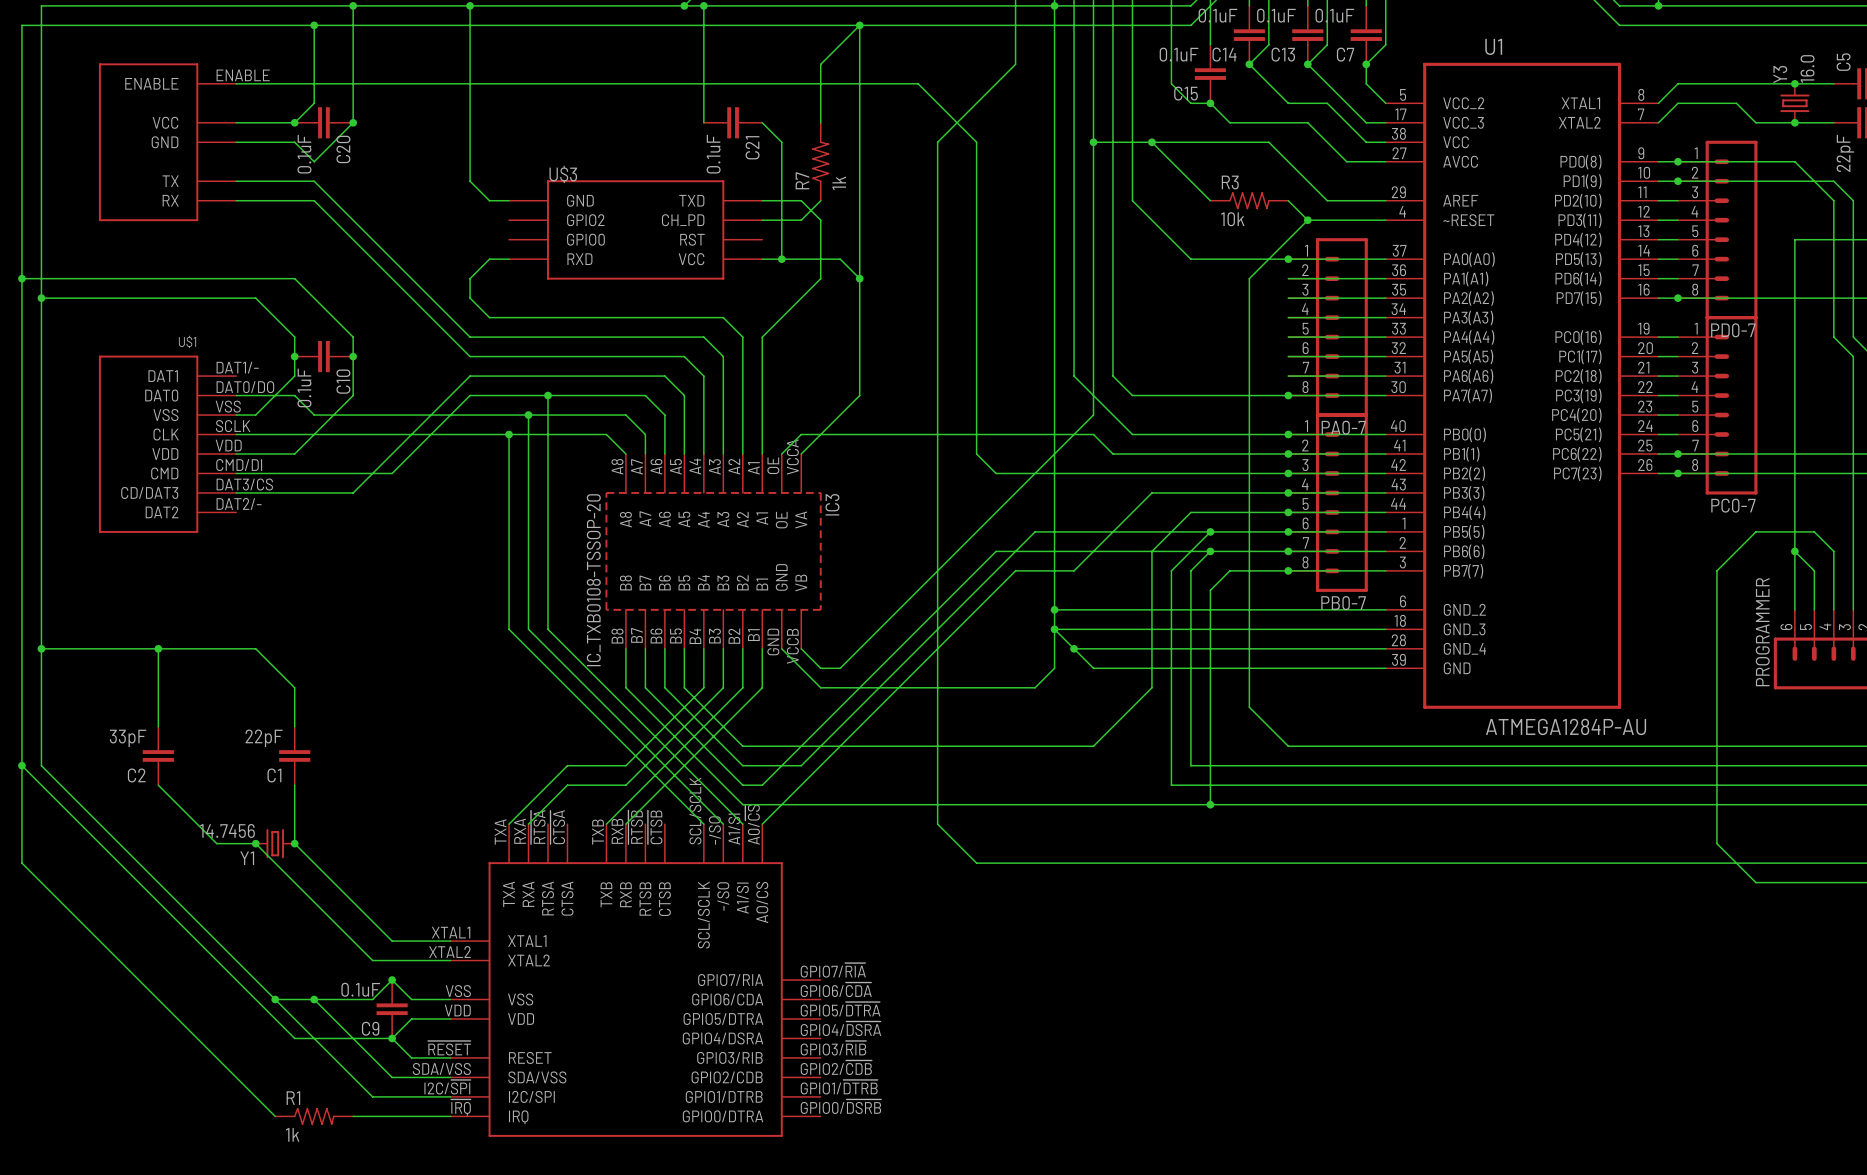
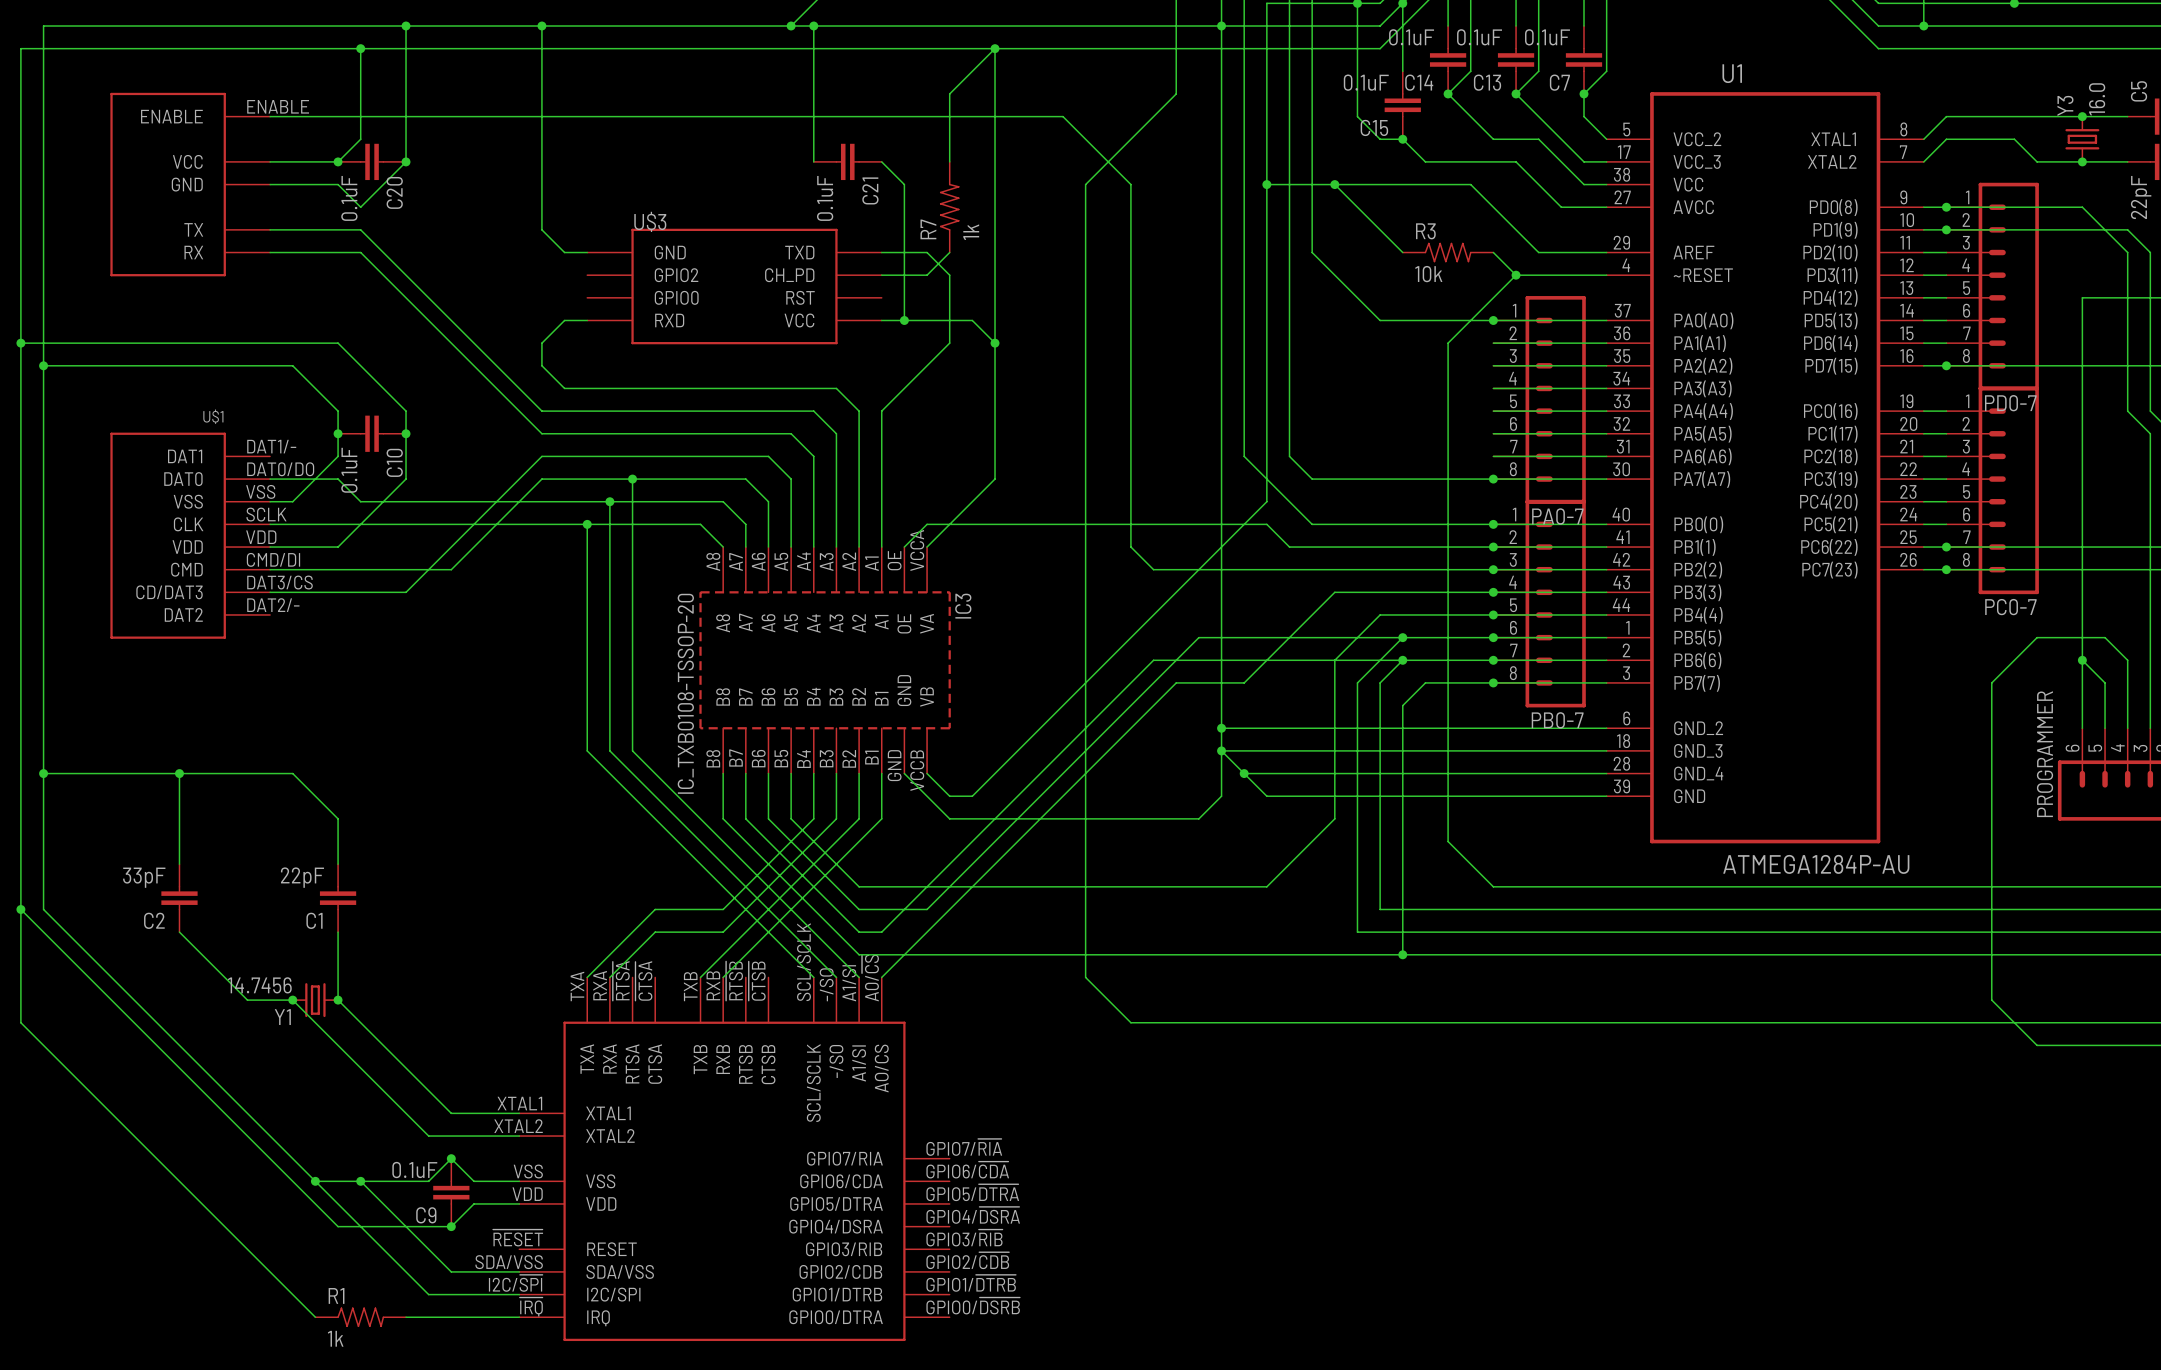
wire: (392, 1038) (411, 1057) (450, 1057) -> none

